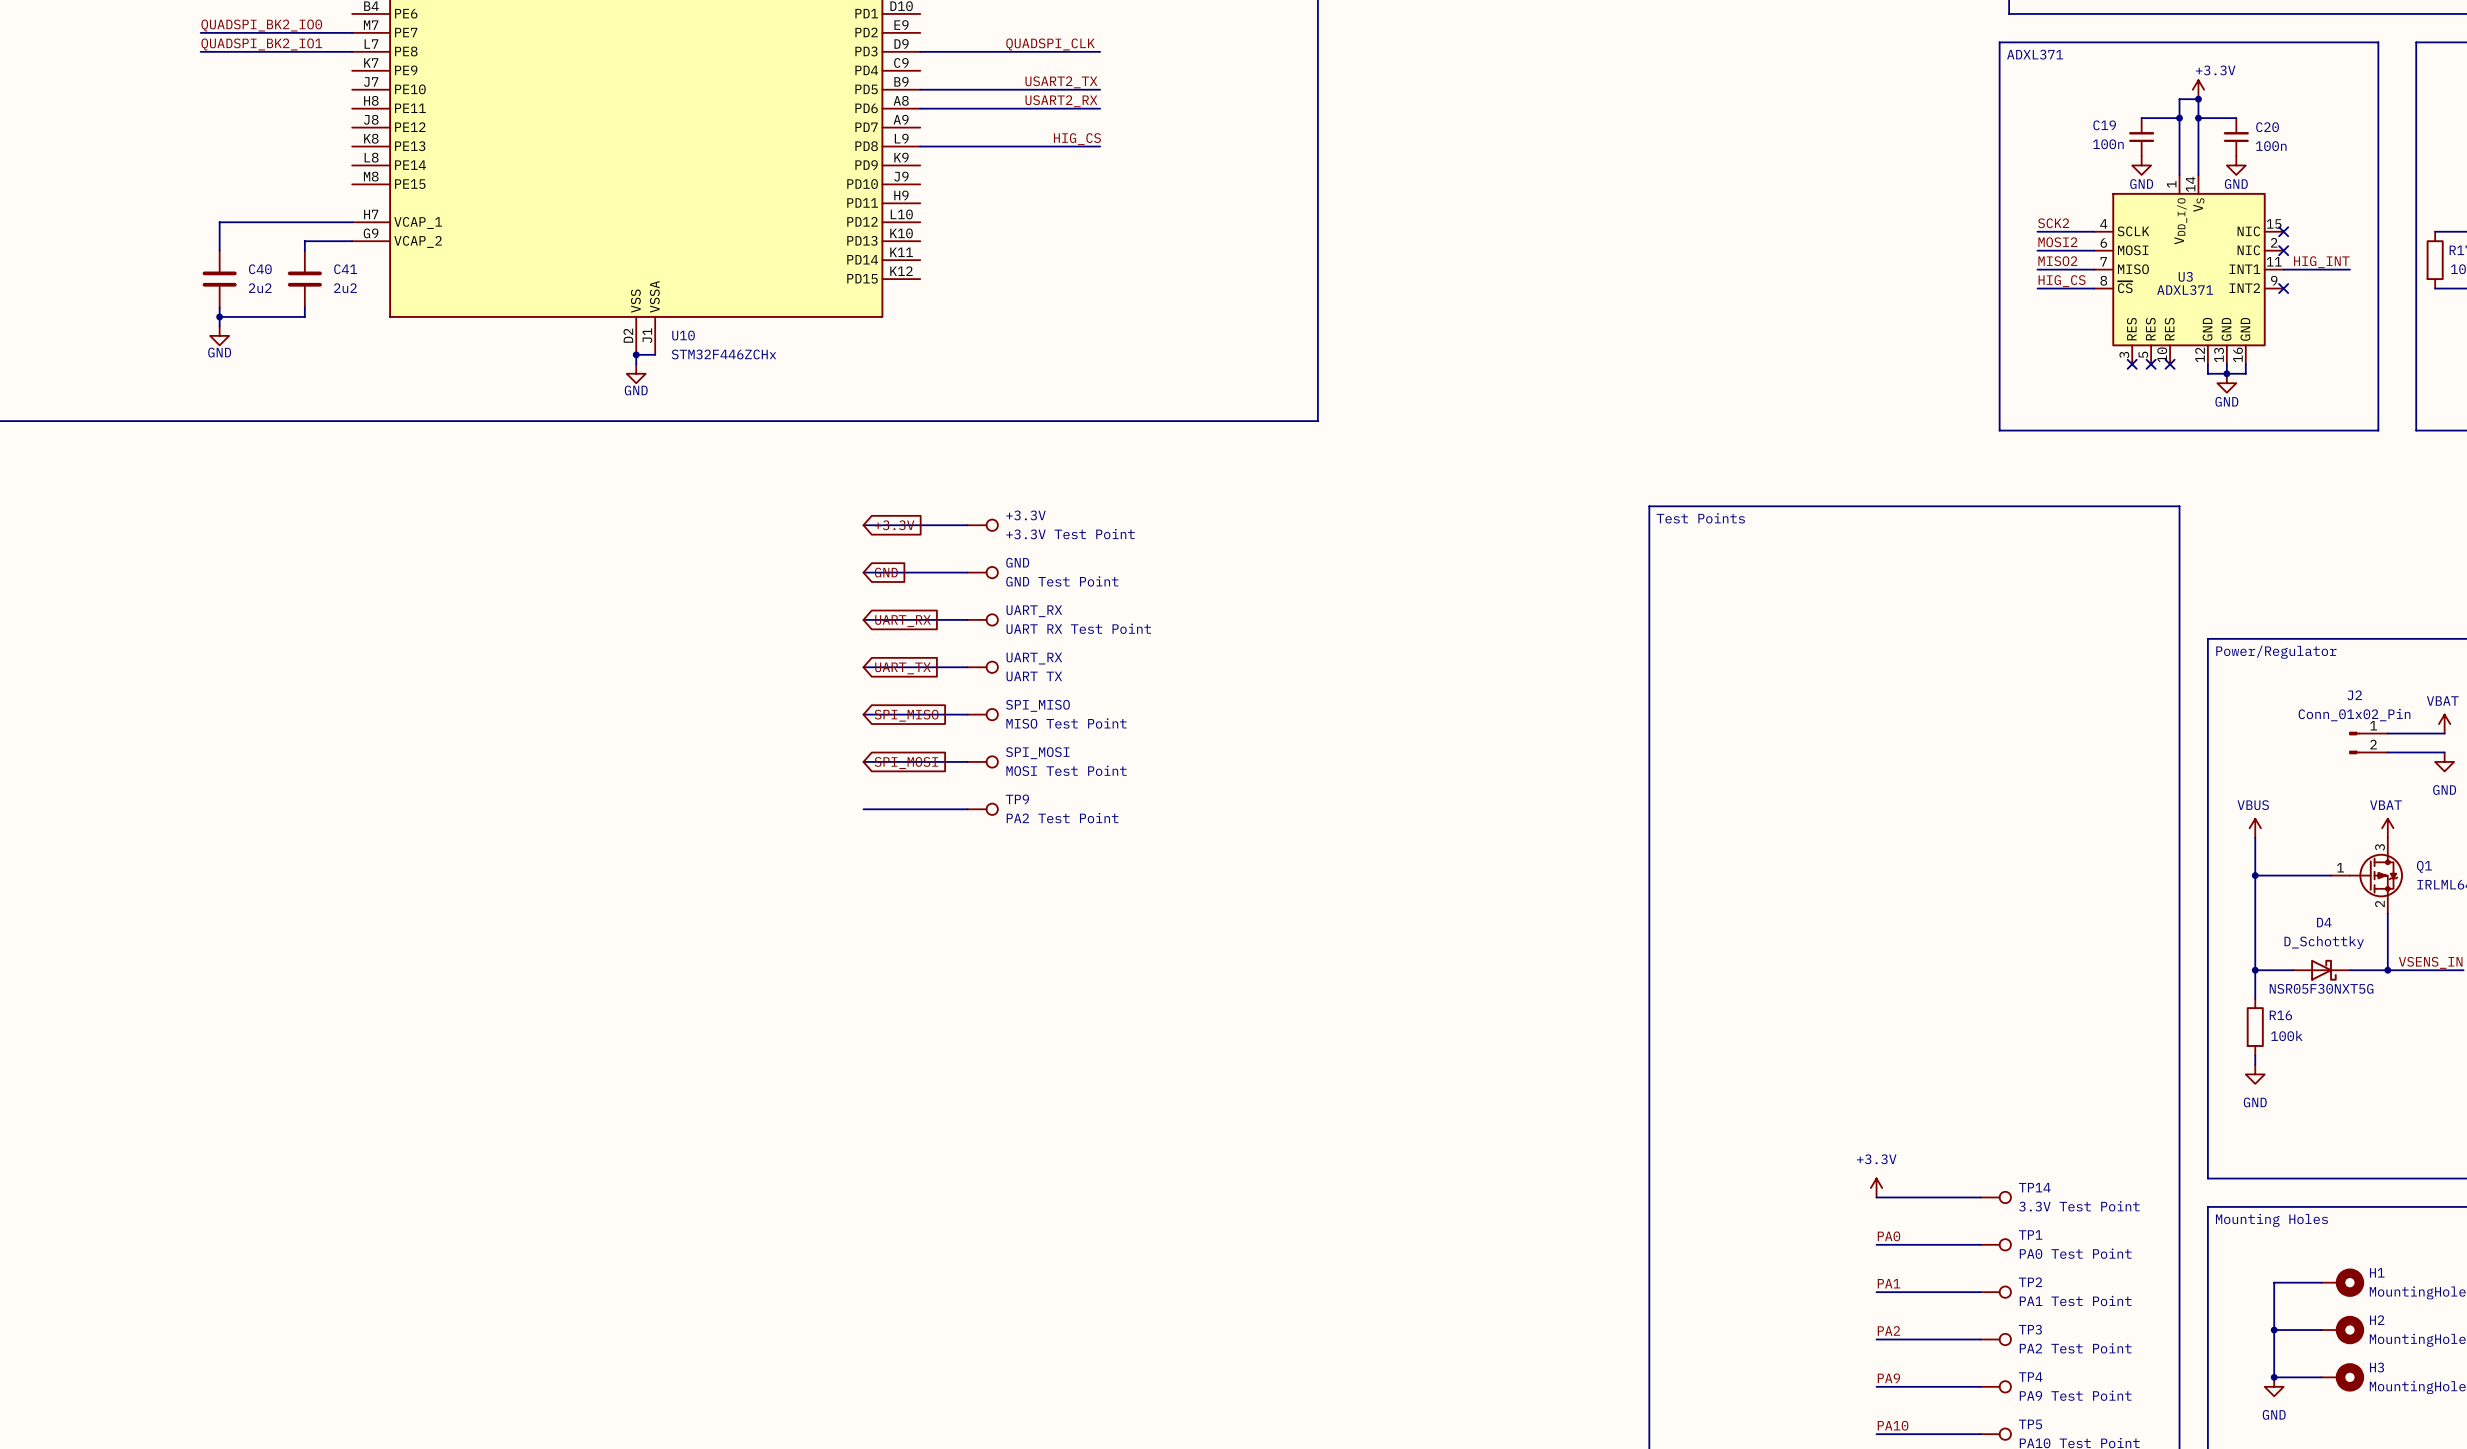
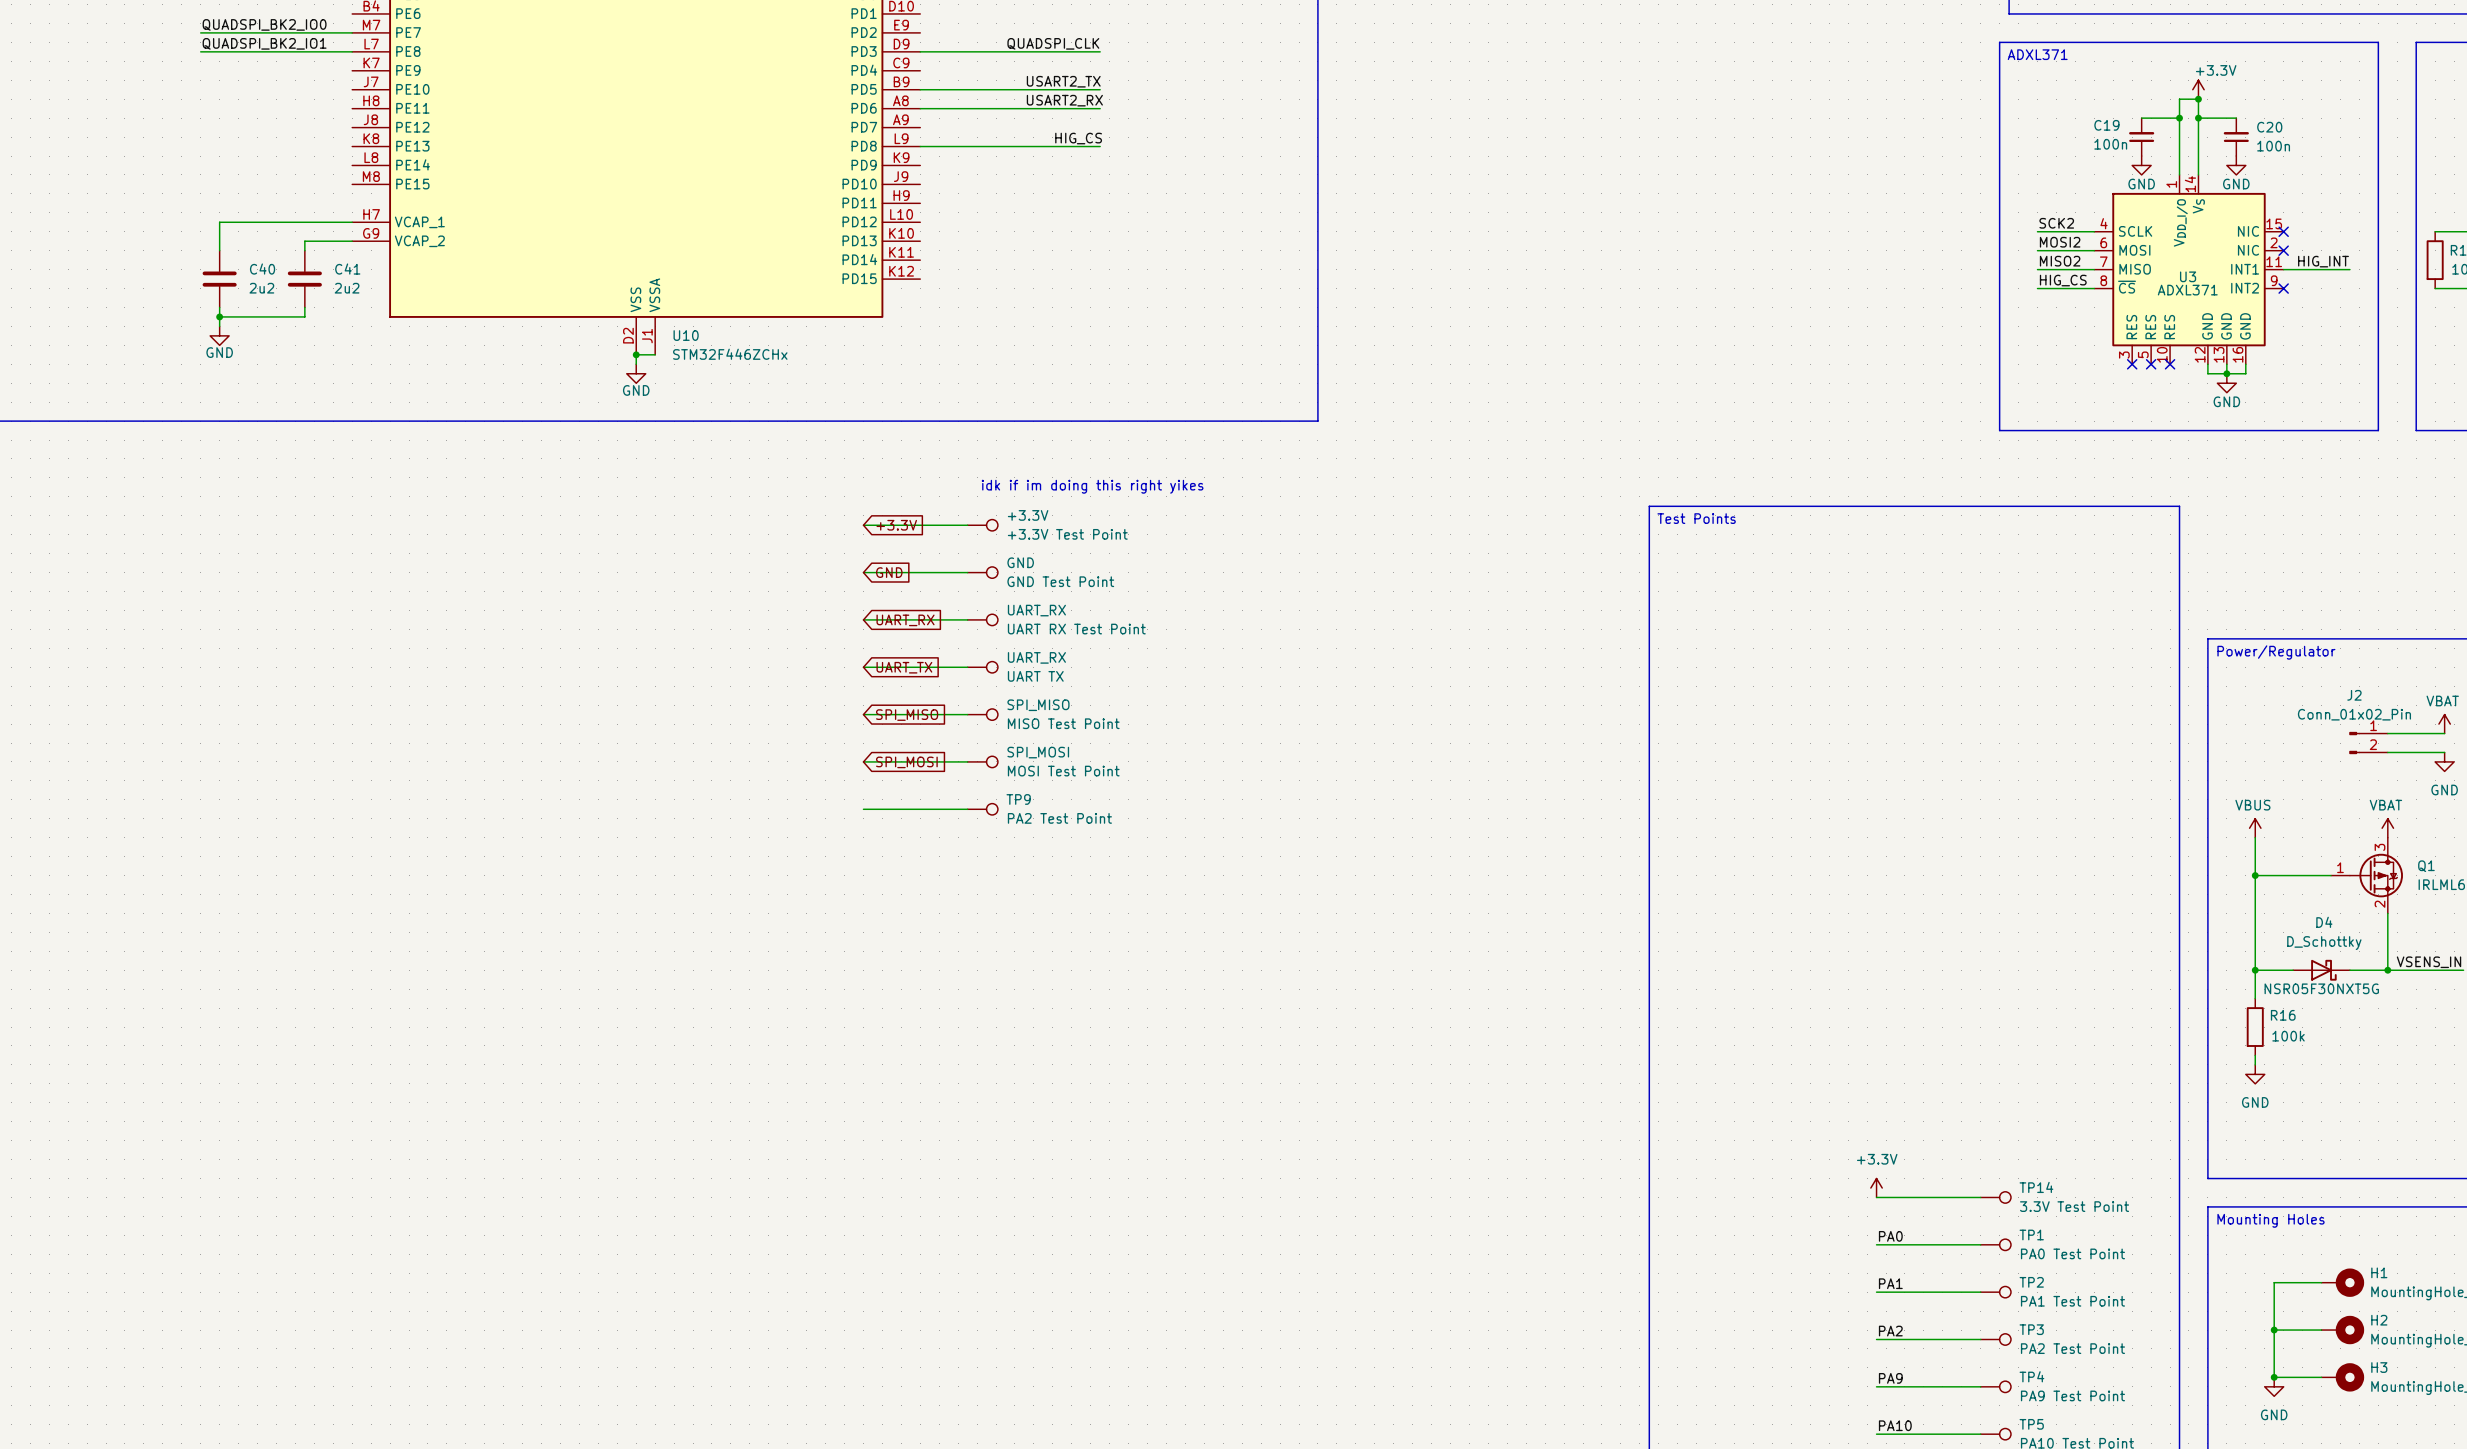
text: none -> idk if im doing this right yikes (1092, 486)

